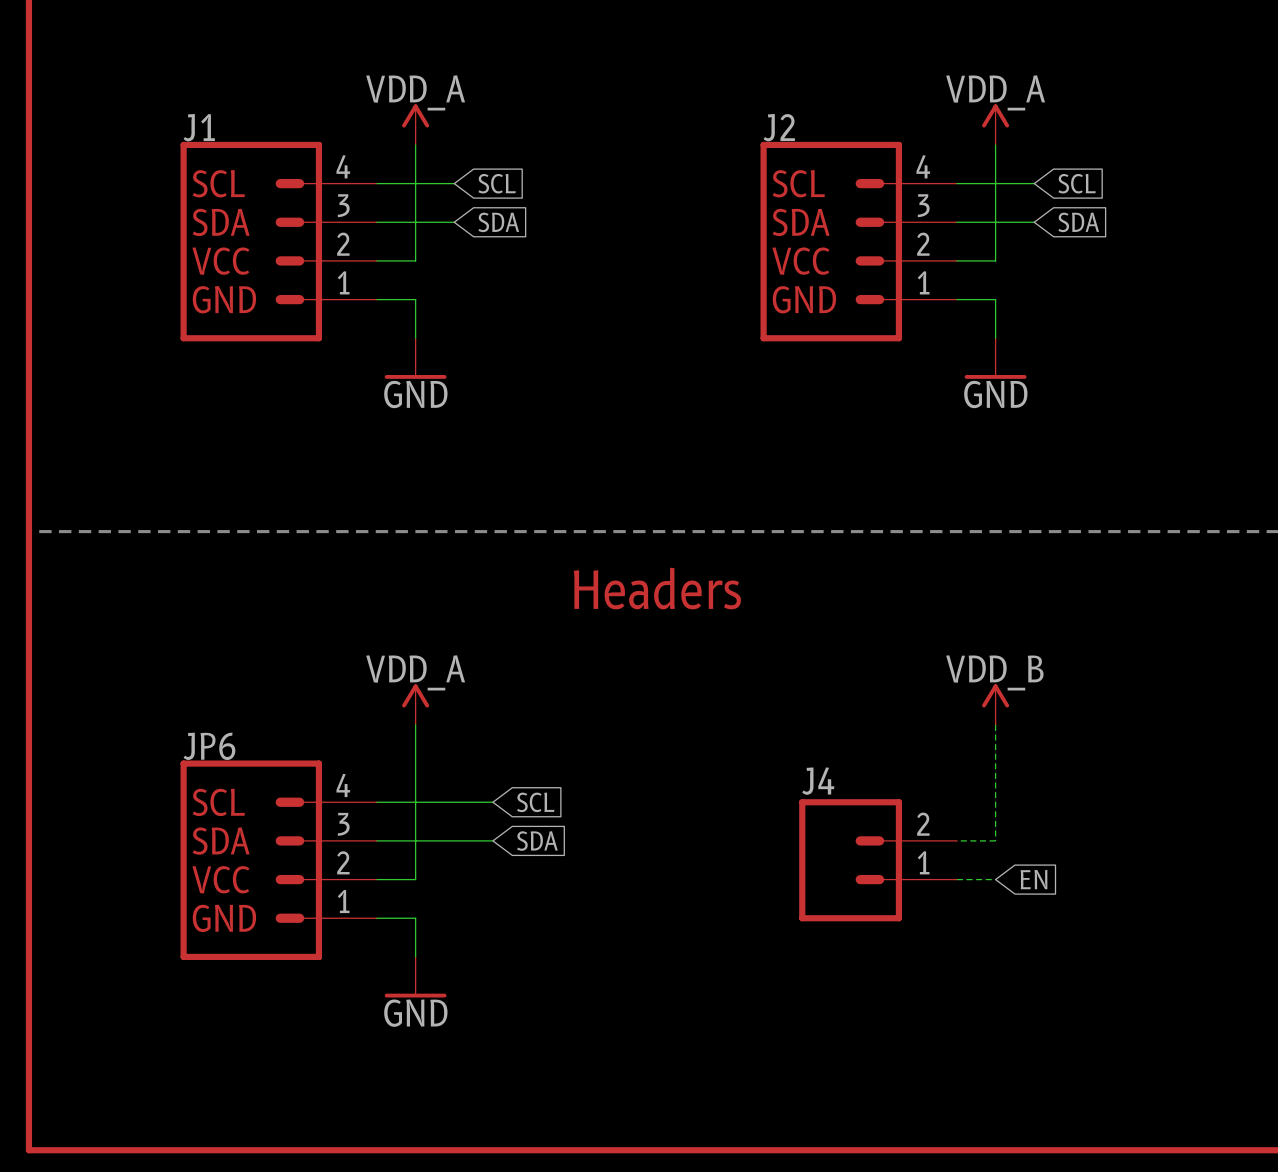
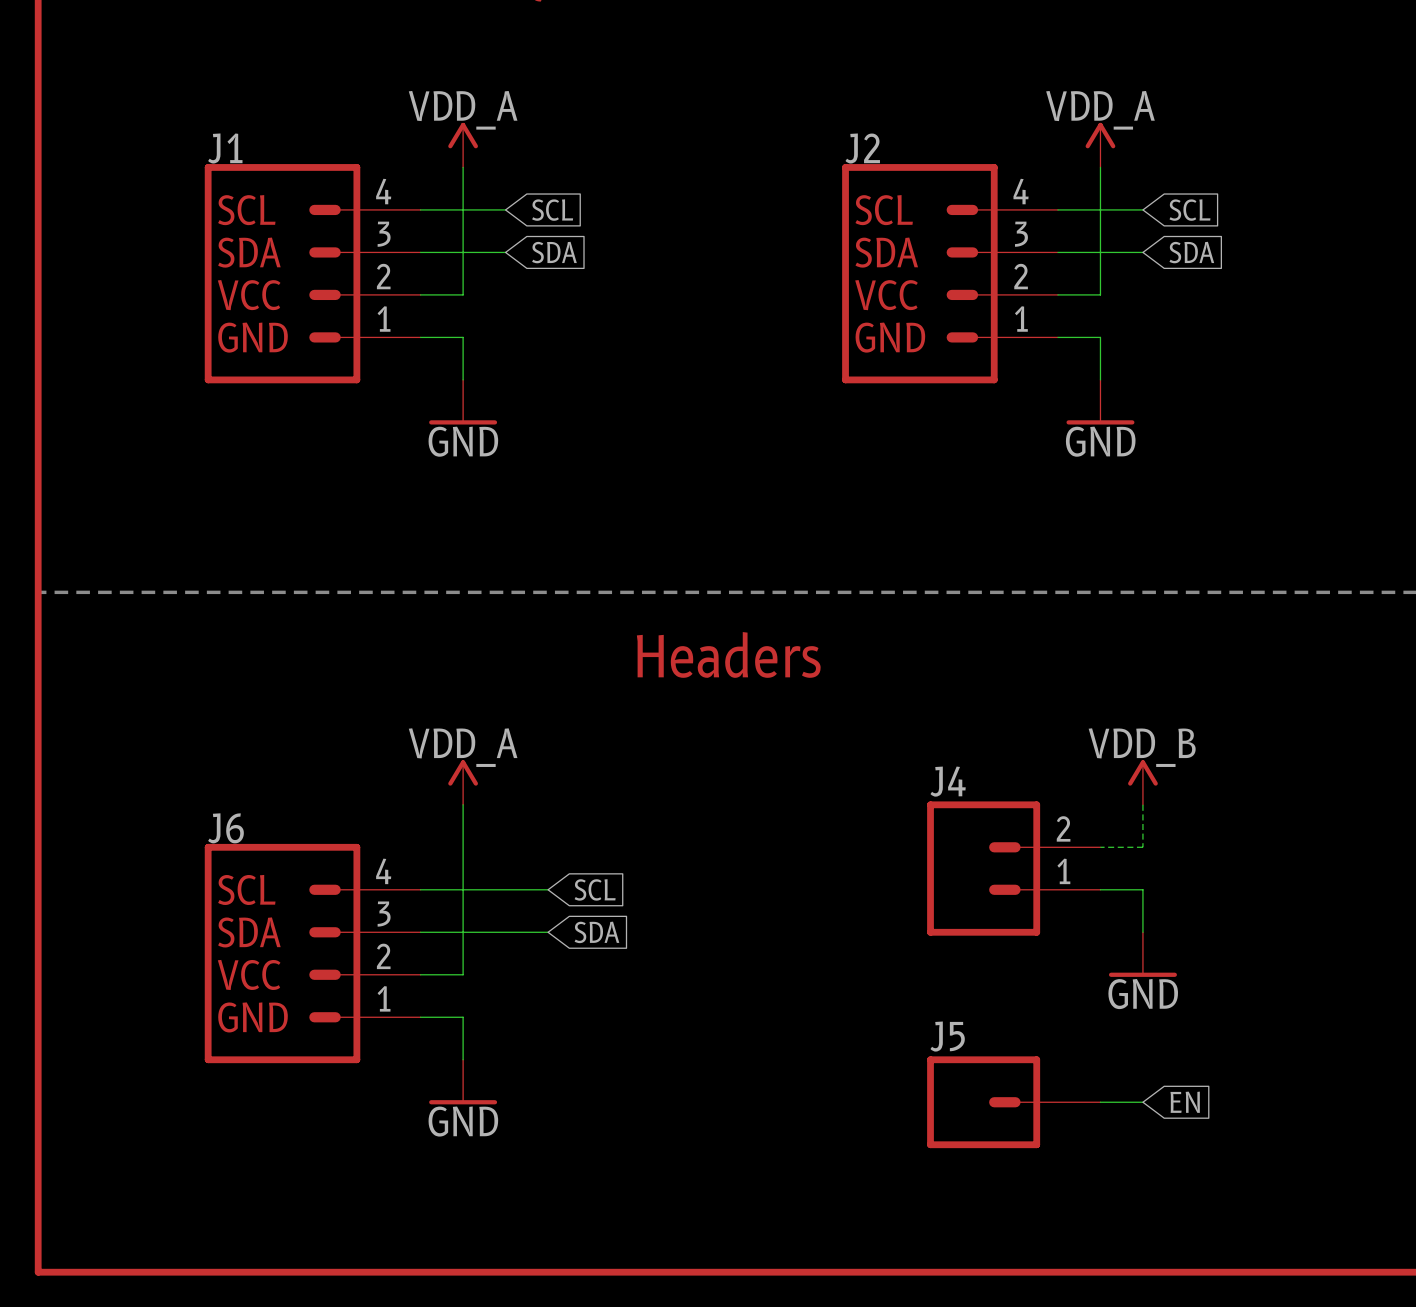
power symbol position: VDD_B (995, 704) -> VDD_B (1142, 782)
wire: (995, 724) (995, 840) (956, 840) -> none
wire: none -> (1142, 804) (1142, 847) (1100, 847)
JP6 name: JP6 (209, 746) -> J6 (226, 828)
wire: none -> (1100, 889) (1142, 889) (1142, 932)
J4 position: (878, 860) -> (1013, 868)
power symbol: none -> GND (1142, 954)
wire: (956, 879) (995, 879) -> (1100, 1102) (1142, 1102)
global label position: EN (1033, 879) -> EN (1185, 1102)
J5: none -> (1013, 1102)

